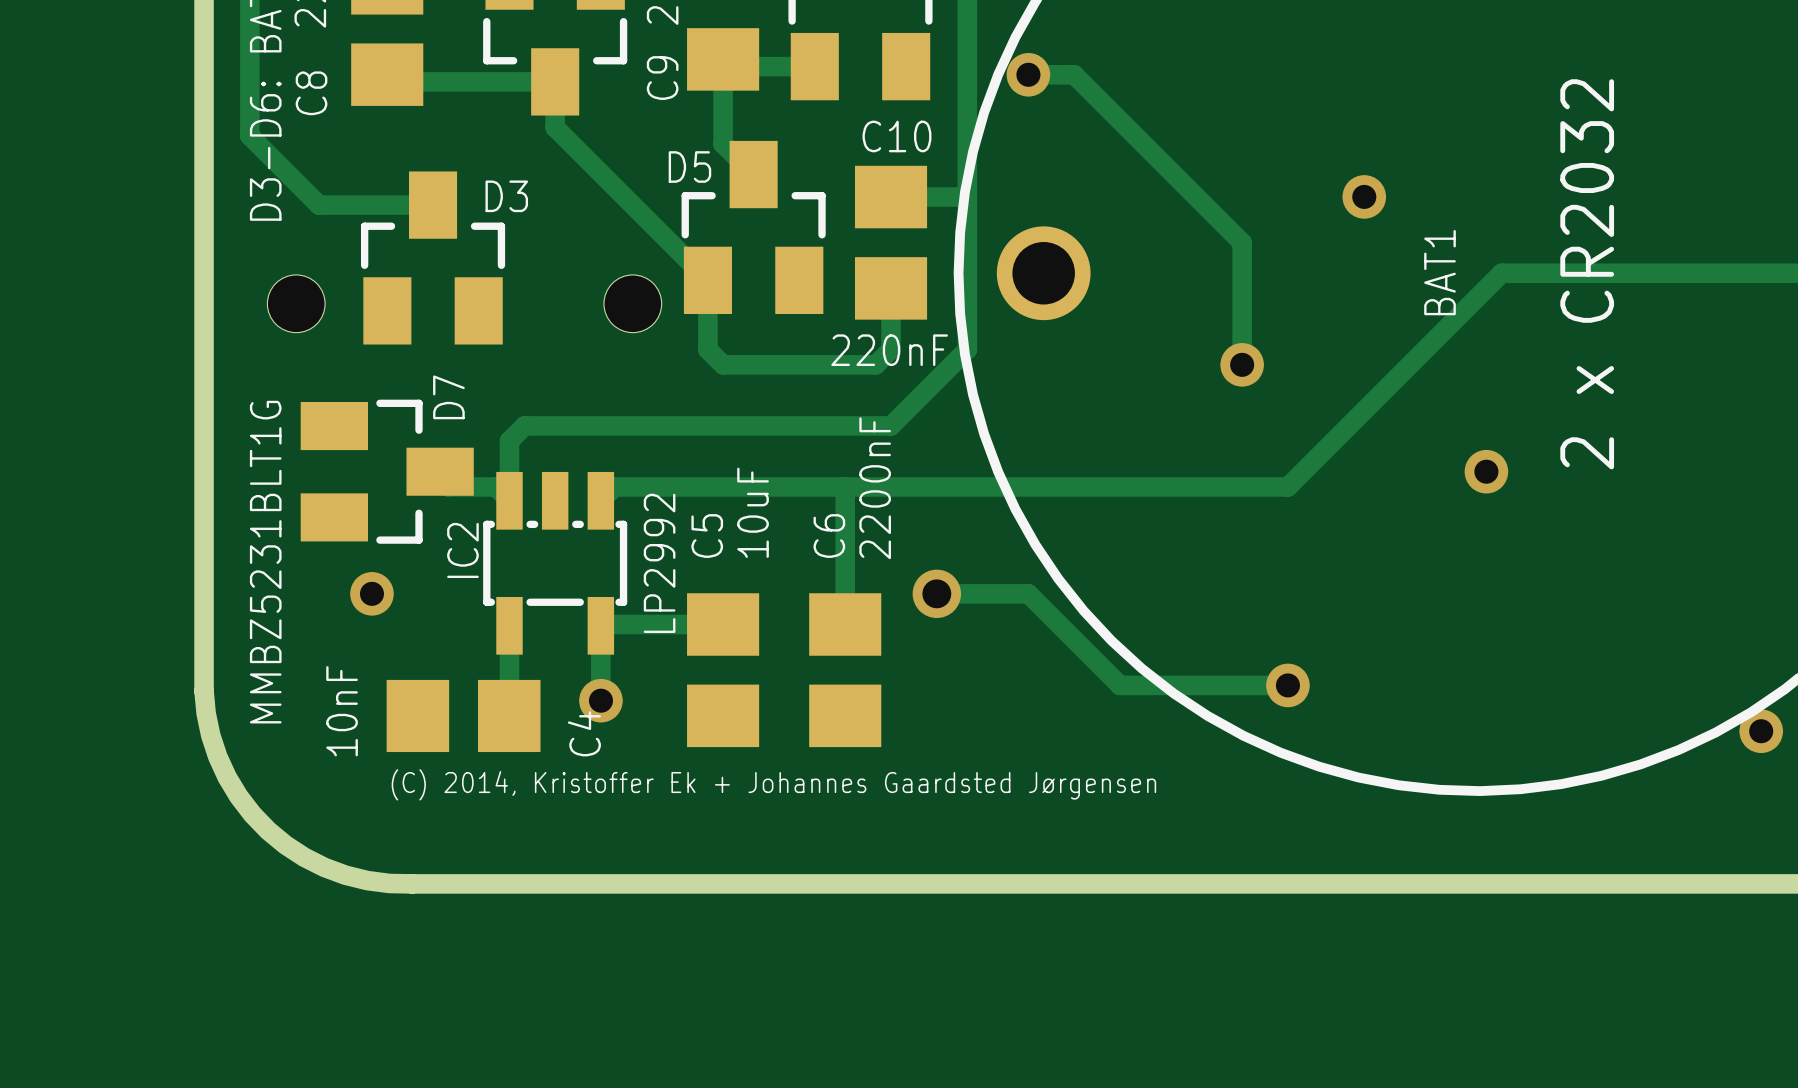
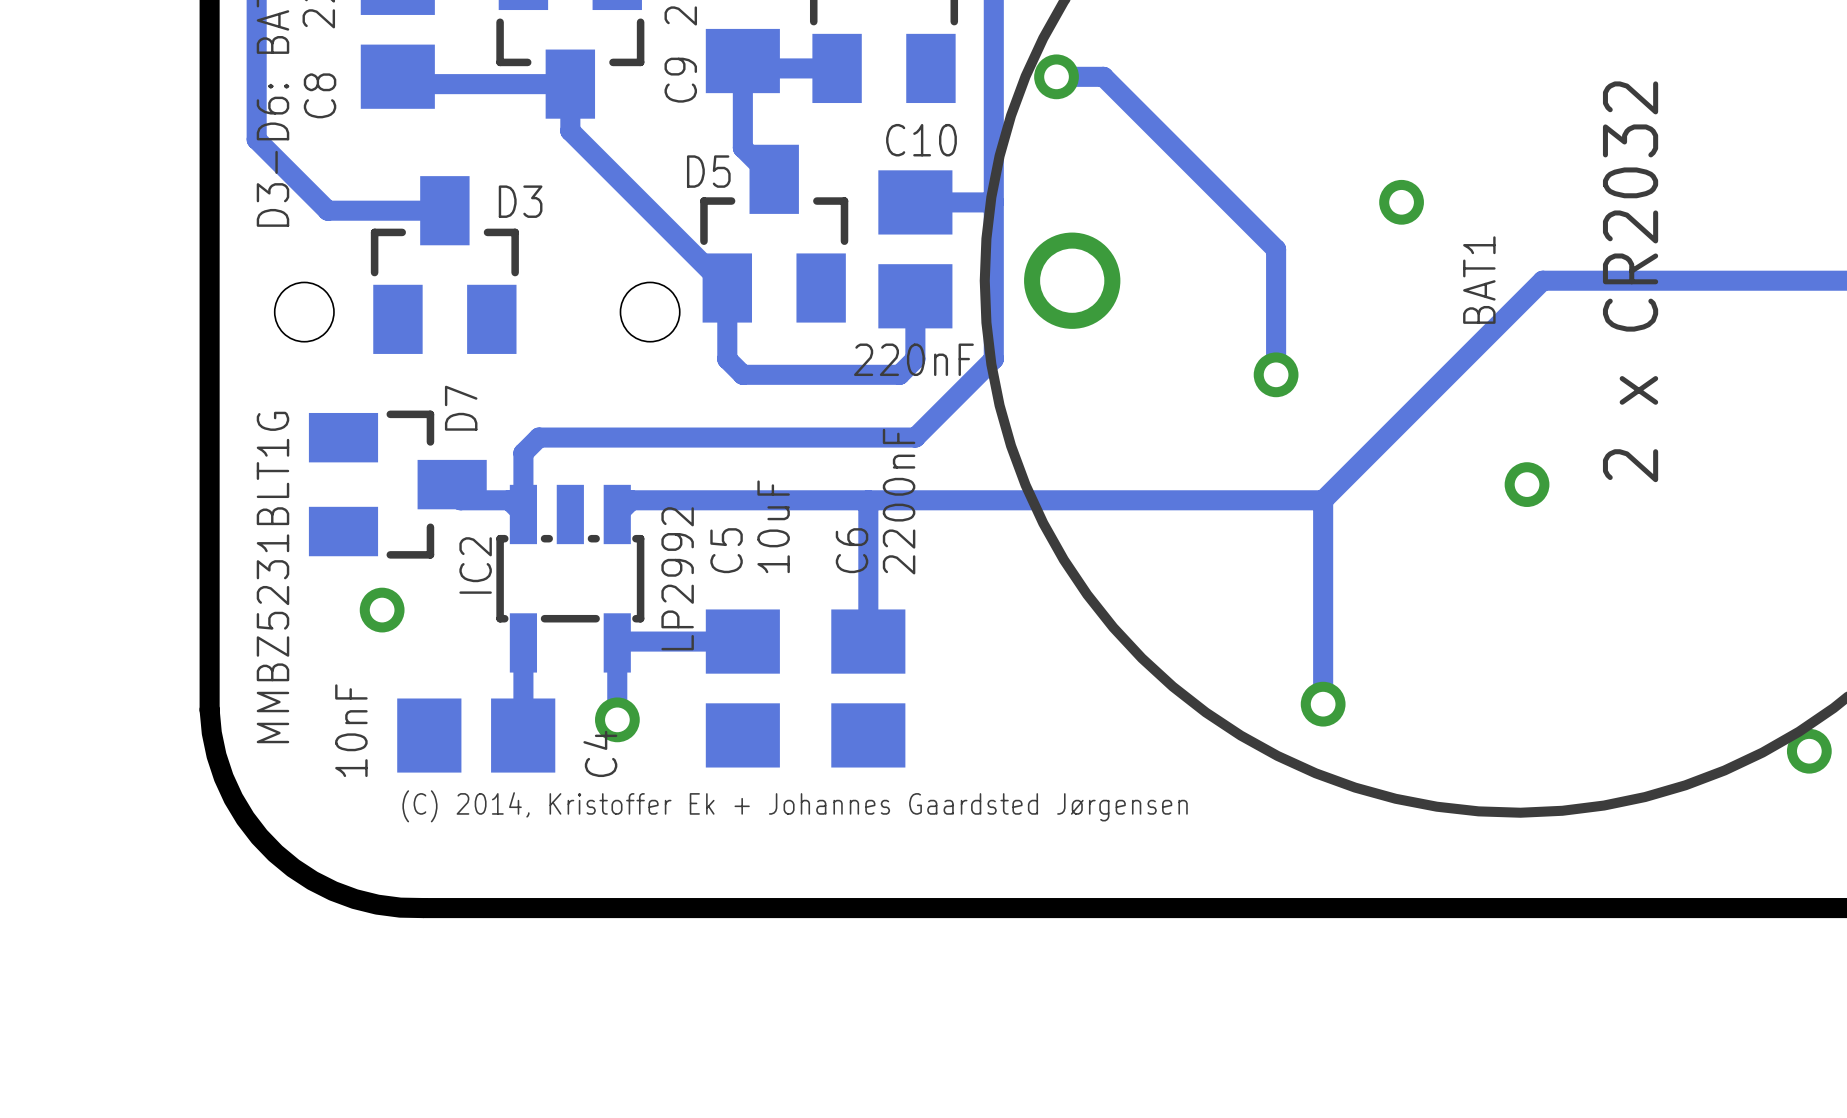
track: (936, 593) (1028, 593) (1120, 685) (1287, 685) -> (1323, 500) (1323, 704)
via: (936, 593) -> none

